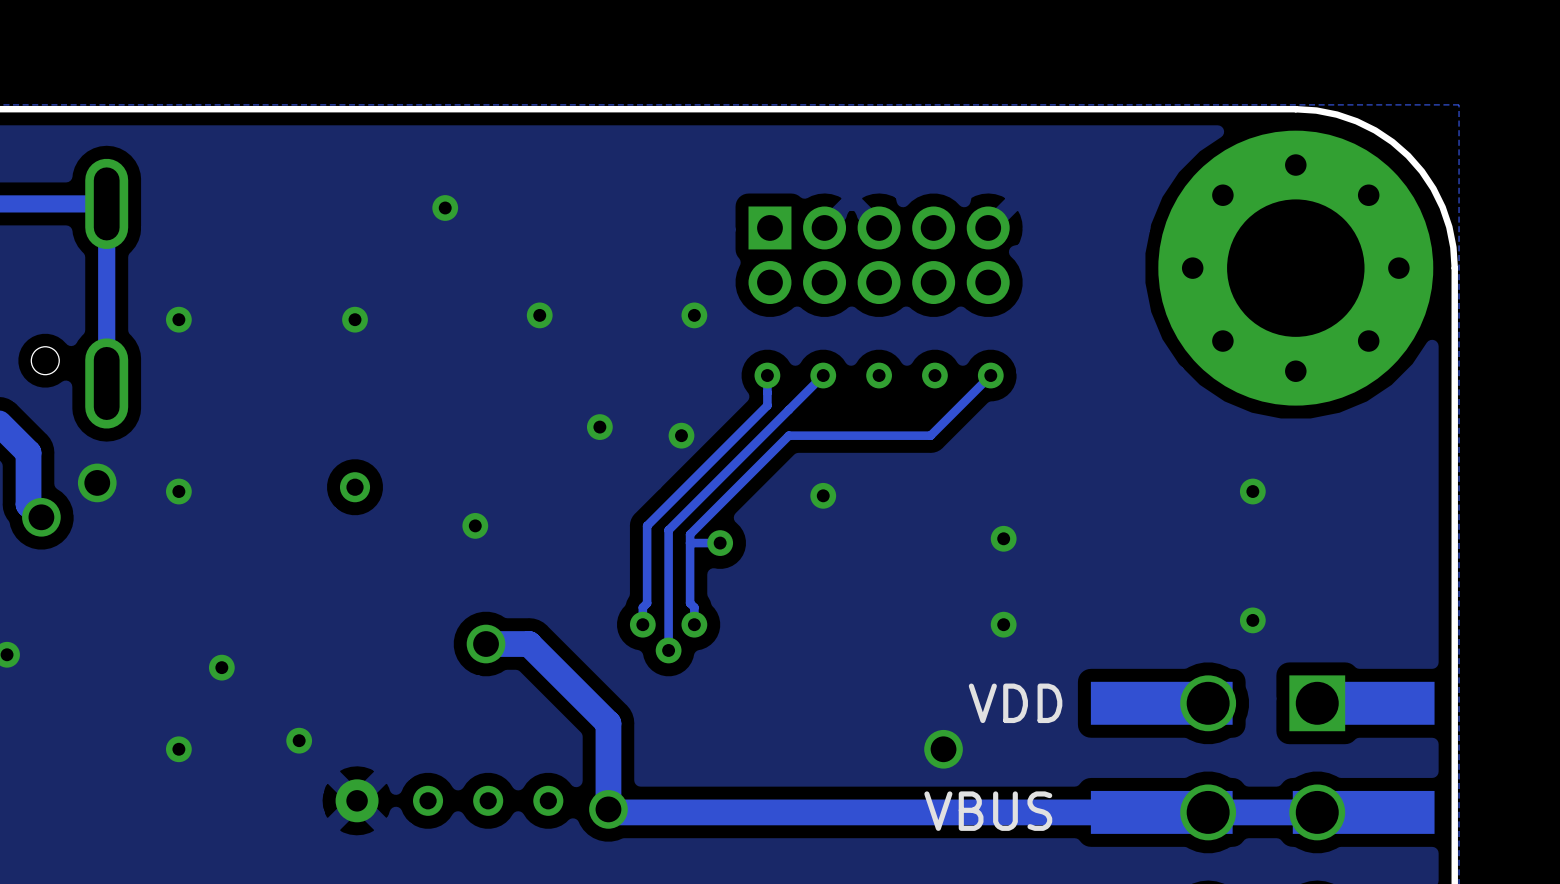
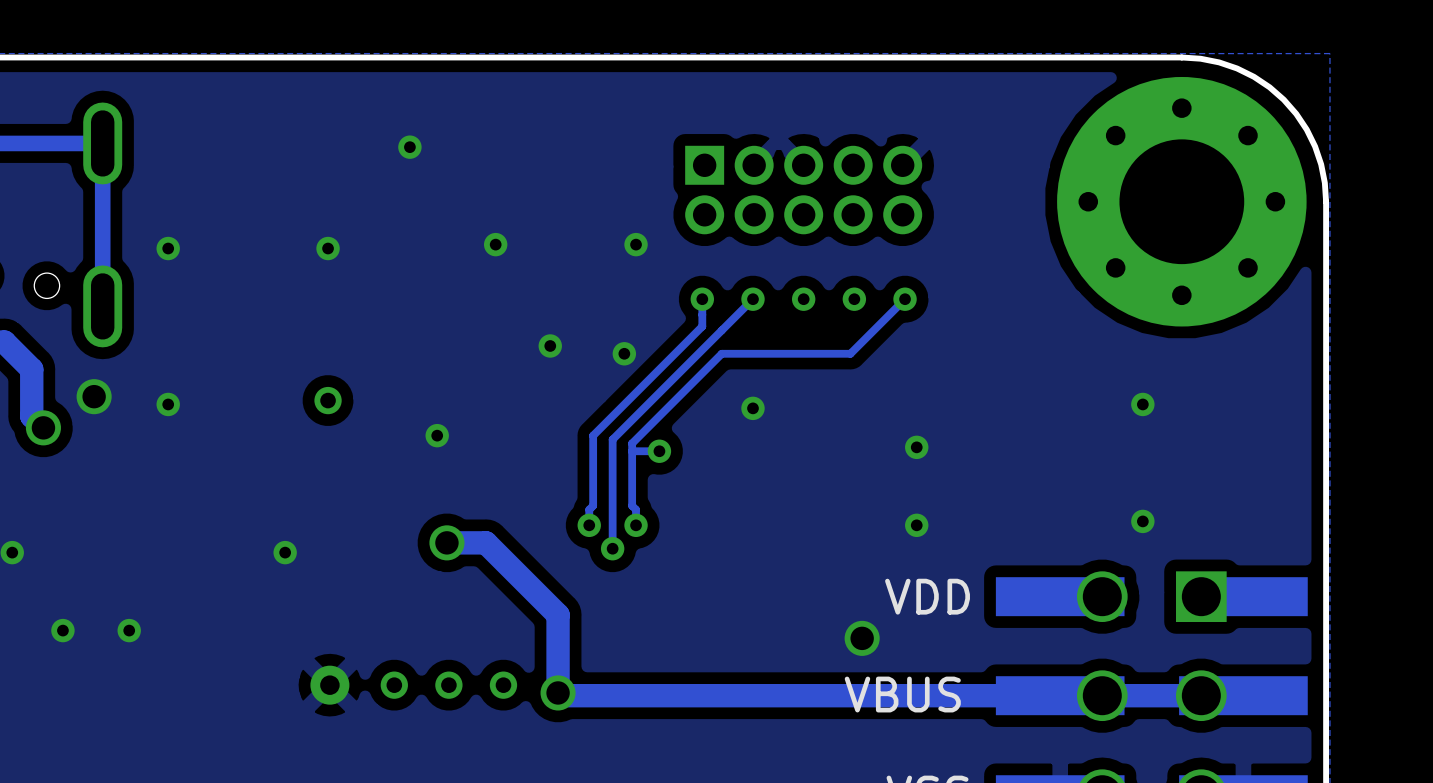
via: none -> (285, 552)
via: (221, 667) -> none
via: none -> (62, 630)
via: (299, 740) -> none
via position: (178, 749) -> (129, 630)

